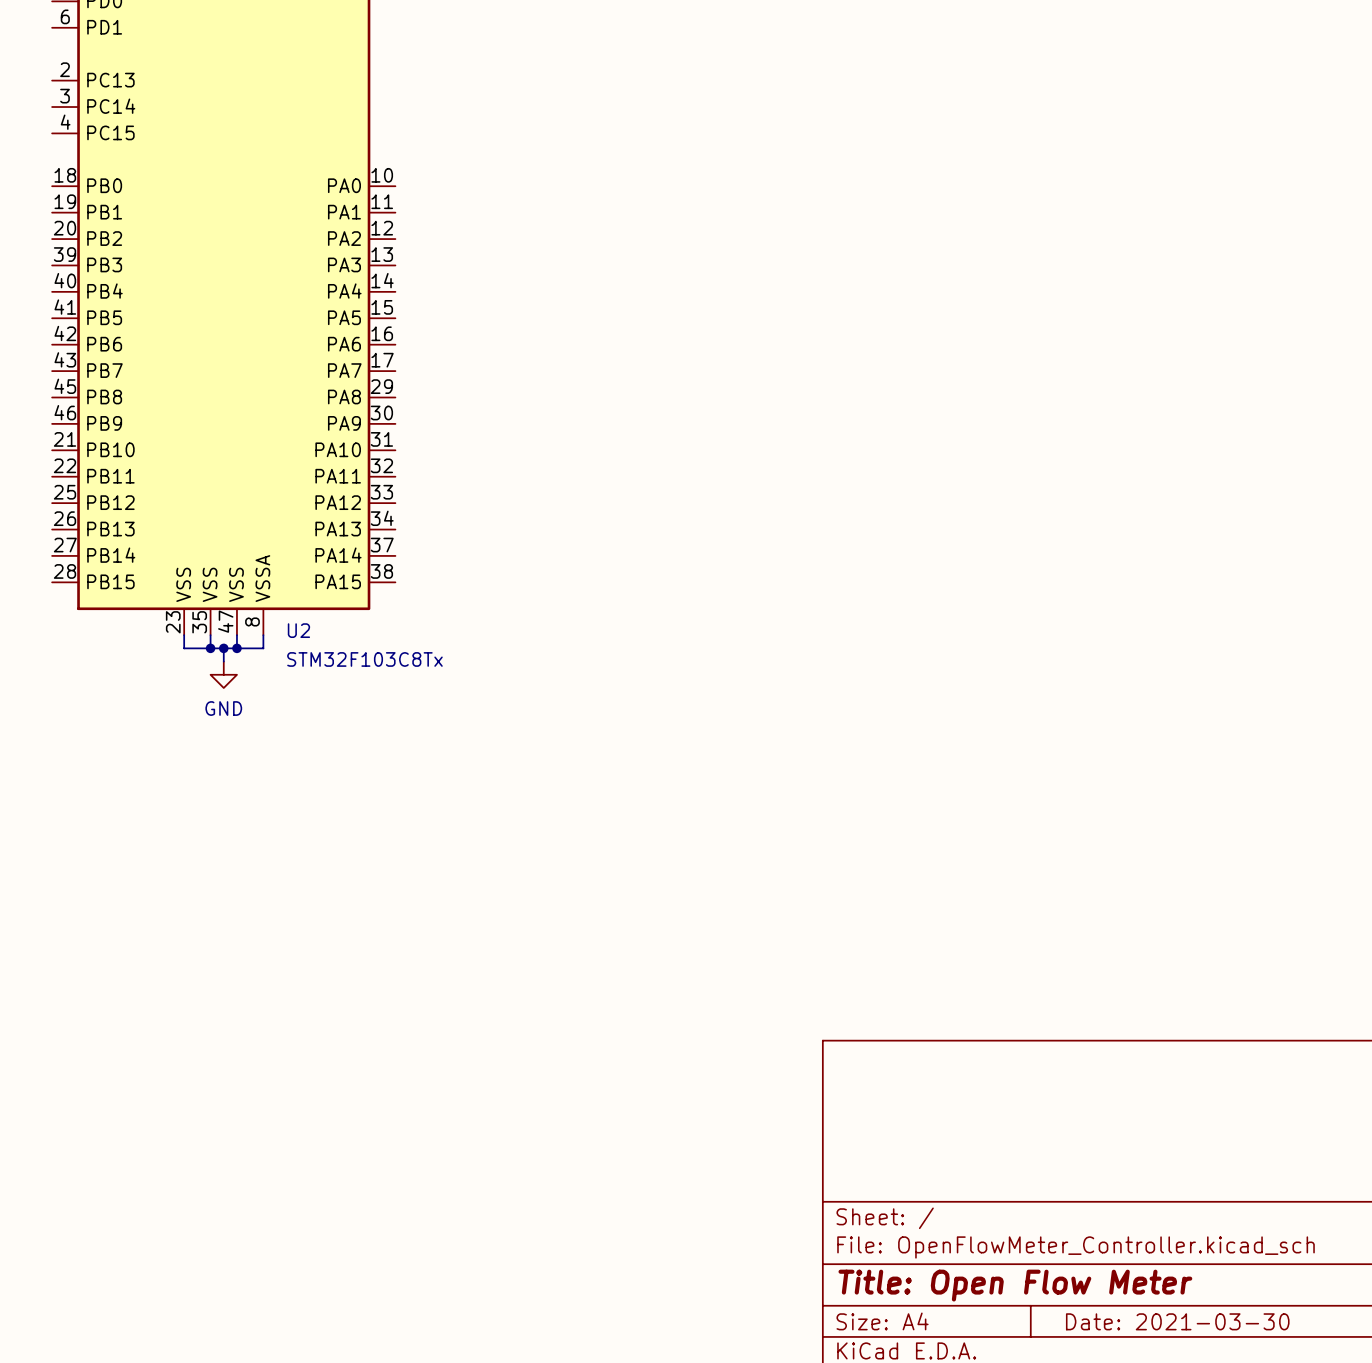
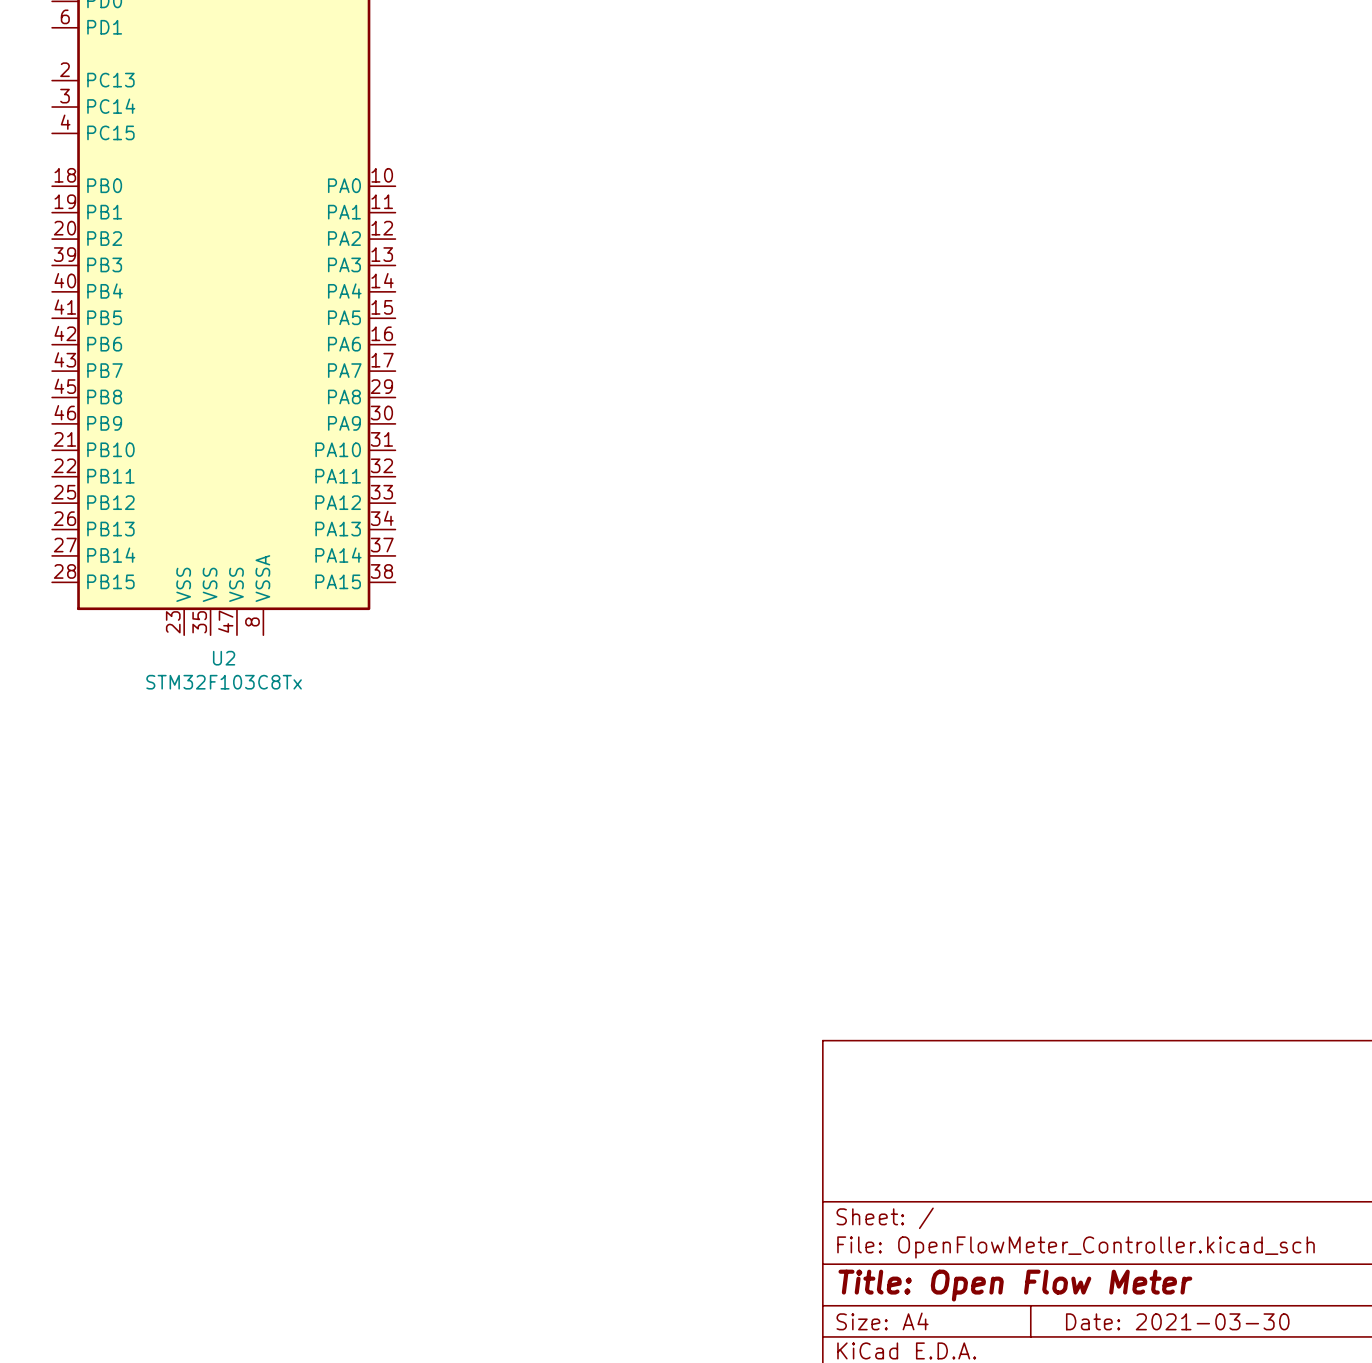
U2 name position: U2 (298, 630) -> U2 (224, 658)
wire: (184, 635) (184, 648) (263, 648) (263, 635) -> none
wire: (210, 635) (210, 648) -> none
wire: (236, 635) (236, 648) -> none
junction: (210, 648) -> none
wire: (223, 648) (223, 661) -> none
junction: (223, 648) -> none
junction: (236, 648) -> none
U2 value position: STM32F103C8Tx (364, 659) -> STM32F103C8Tx (224, 682)
power symbol: GND (223, 674) -> none

